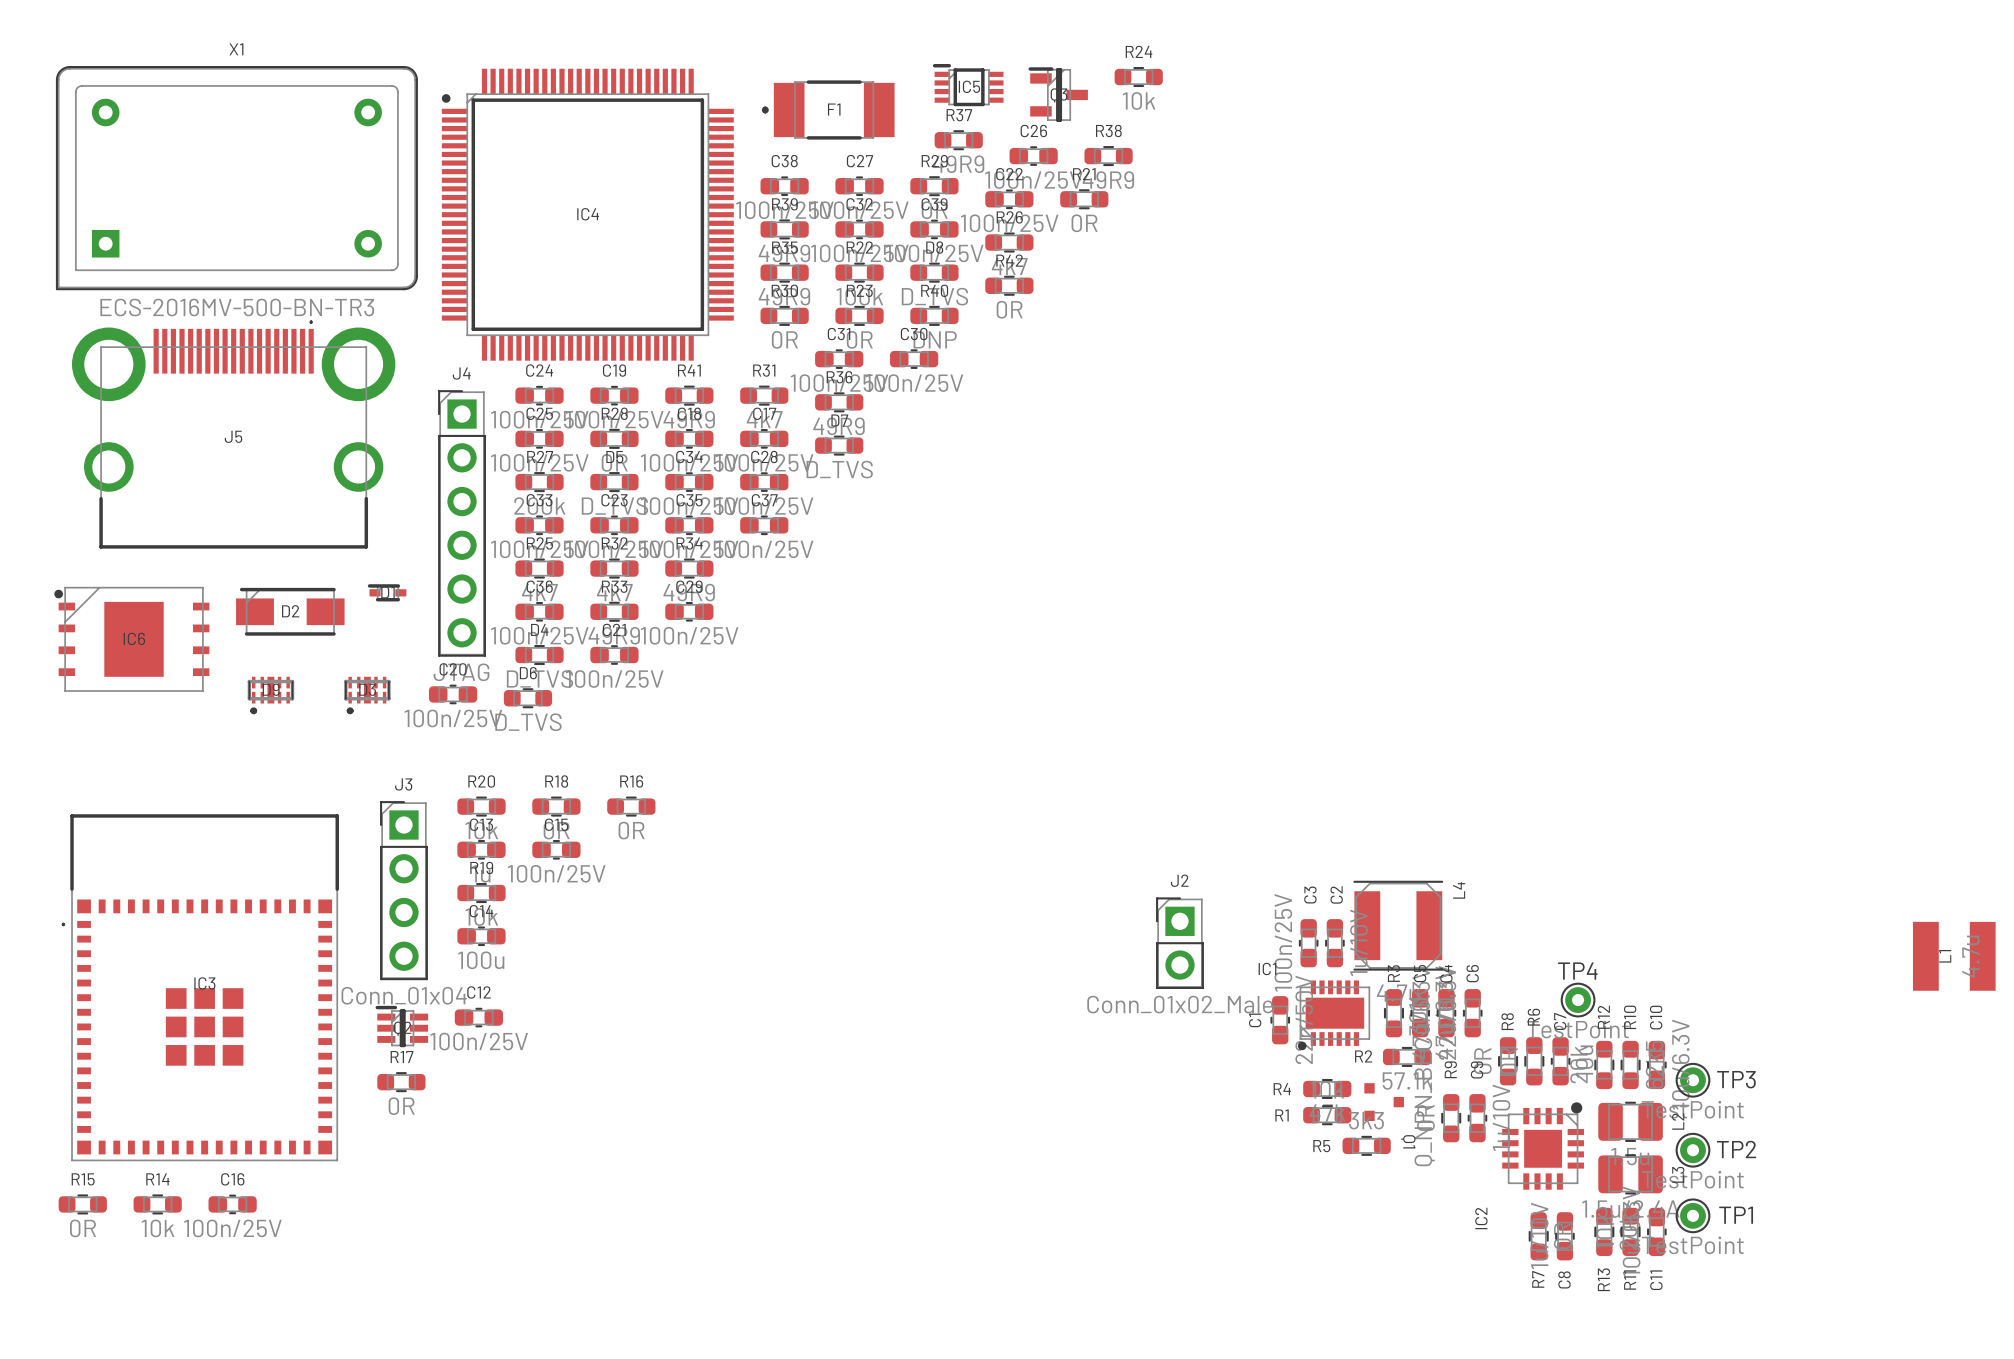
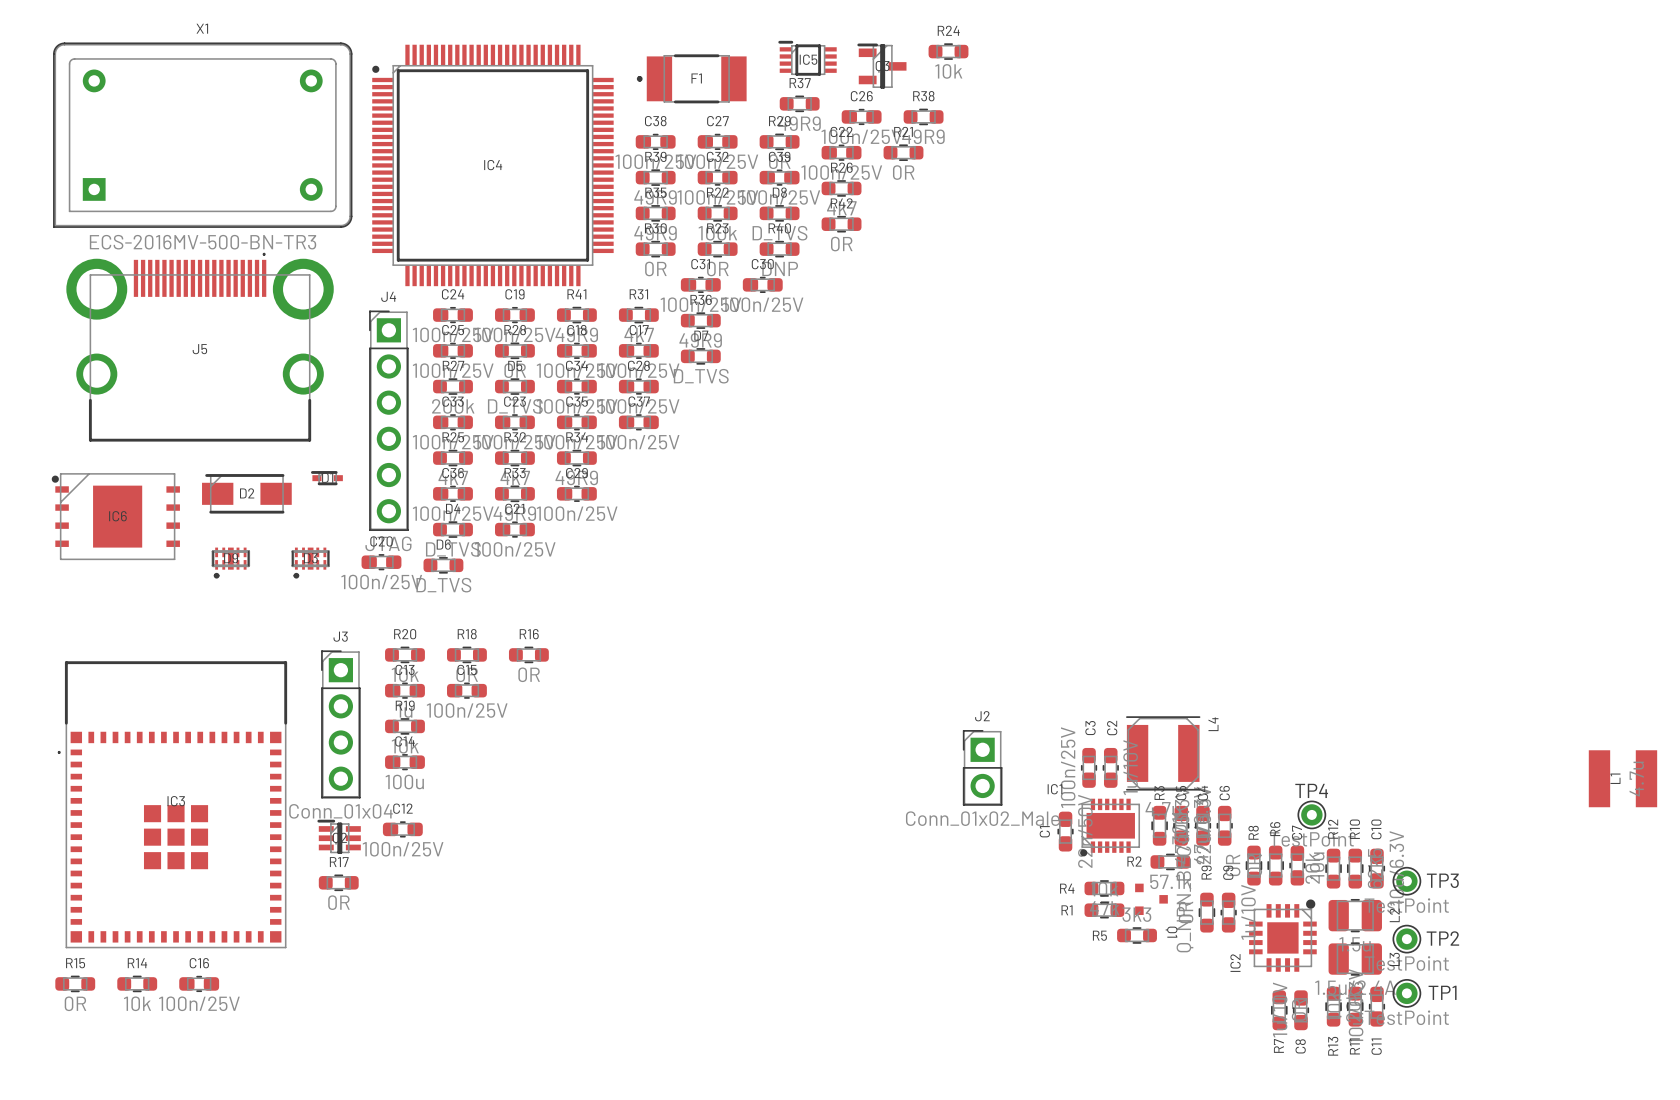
IC2 name position: IC2 (1481, 1218) -> IC2 (1235, 963)

